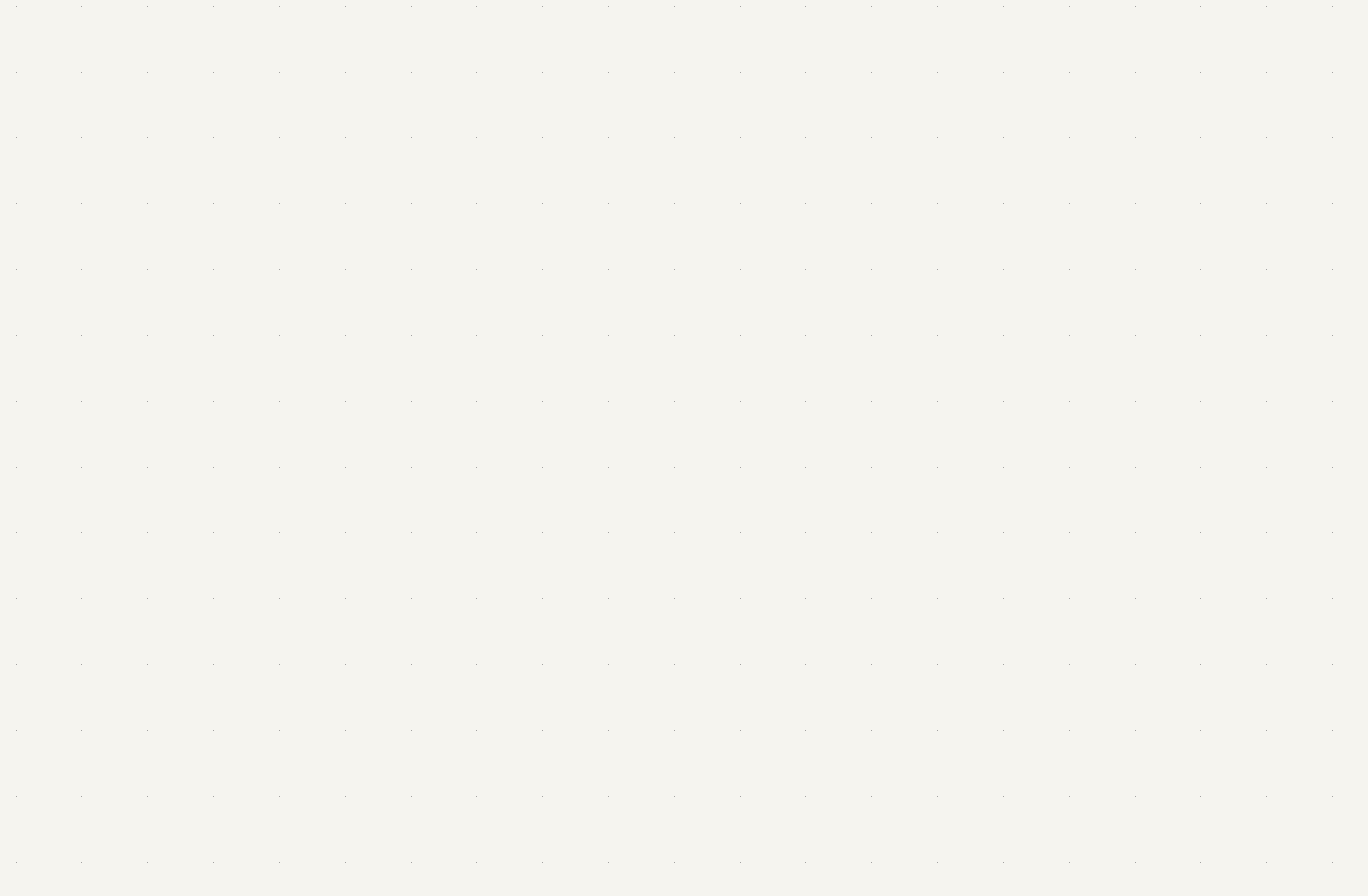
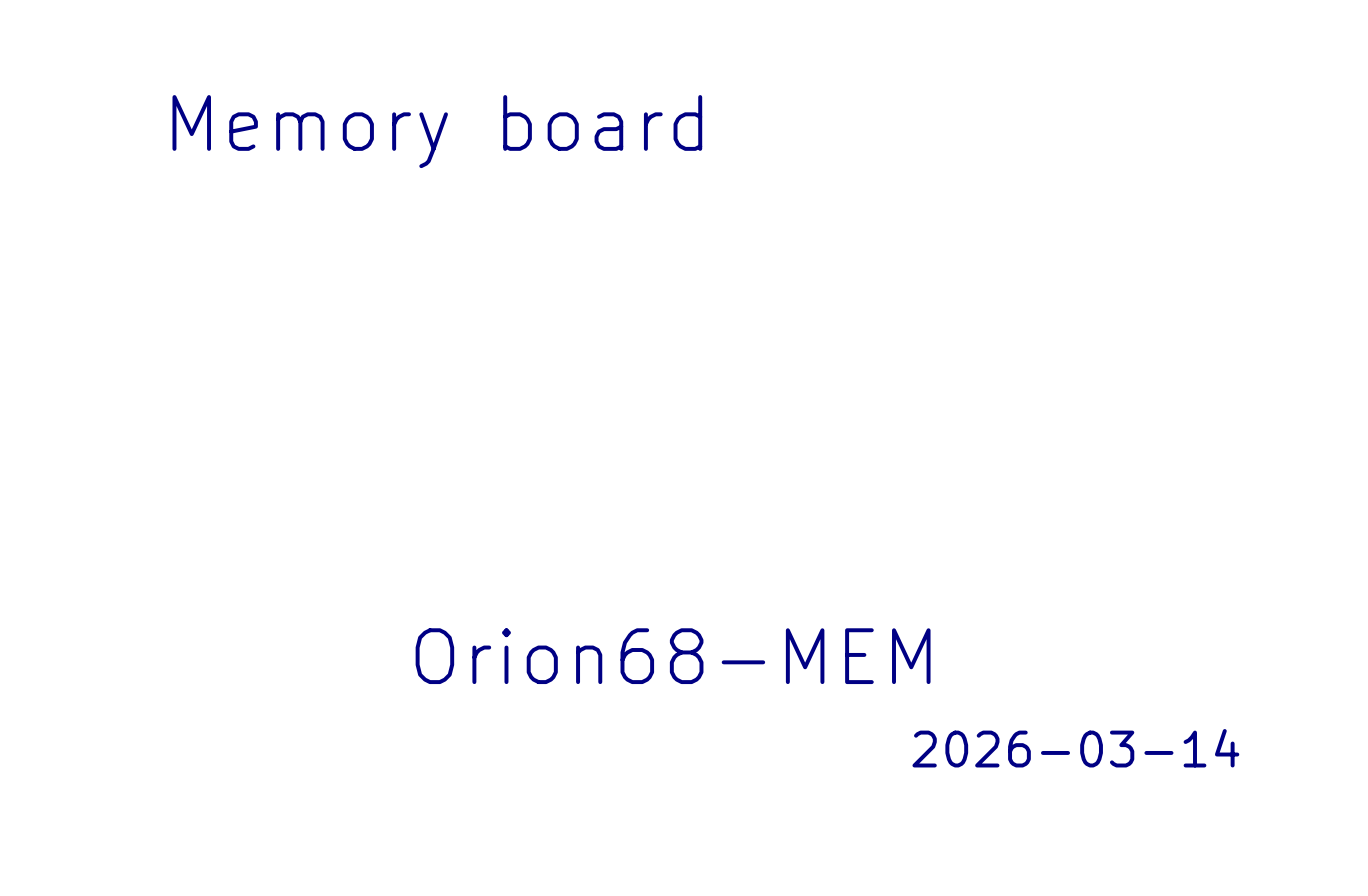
text: none -> Memory board (437, 131)
text: none -> Orion68-MEM (673, 656)
text: none -> 2026-03-14 (1075, 748)

